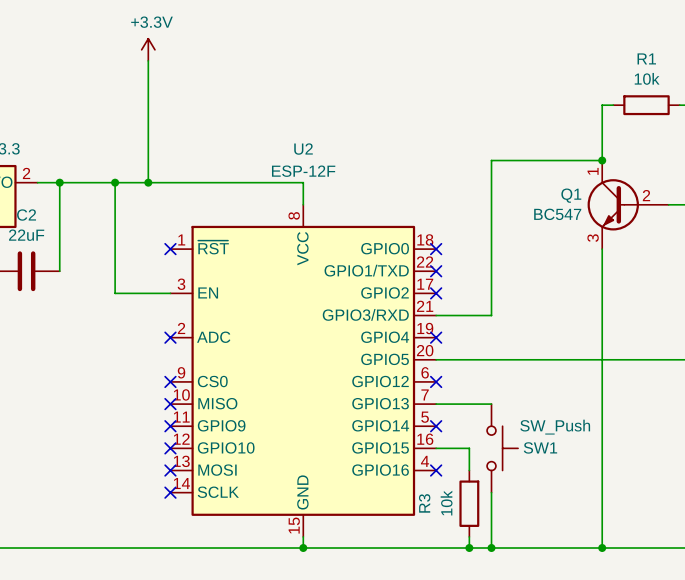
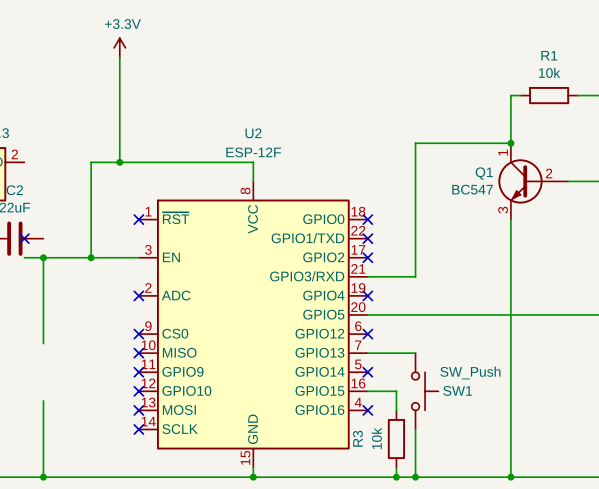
wire: (37, 182) (115, 182) -> (24, 257) (91, 257)
wire: (59, 182) (59, 271) -> none
junction: (59, 182) -> none
junction: (115, 182) -> none
no-connect mark: none -> (24, 238)
wire: none -> (43, 257) (43, 343)
junction: none -> (43, 257)
junction: none -> (91, 257)
wire: none -> (43, 400) (43, 477)
junction: none -> (43, 477)

